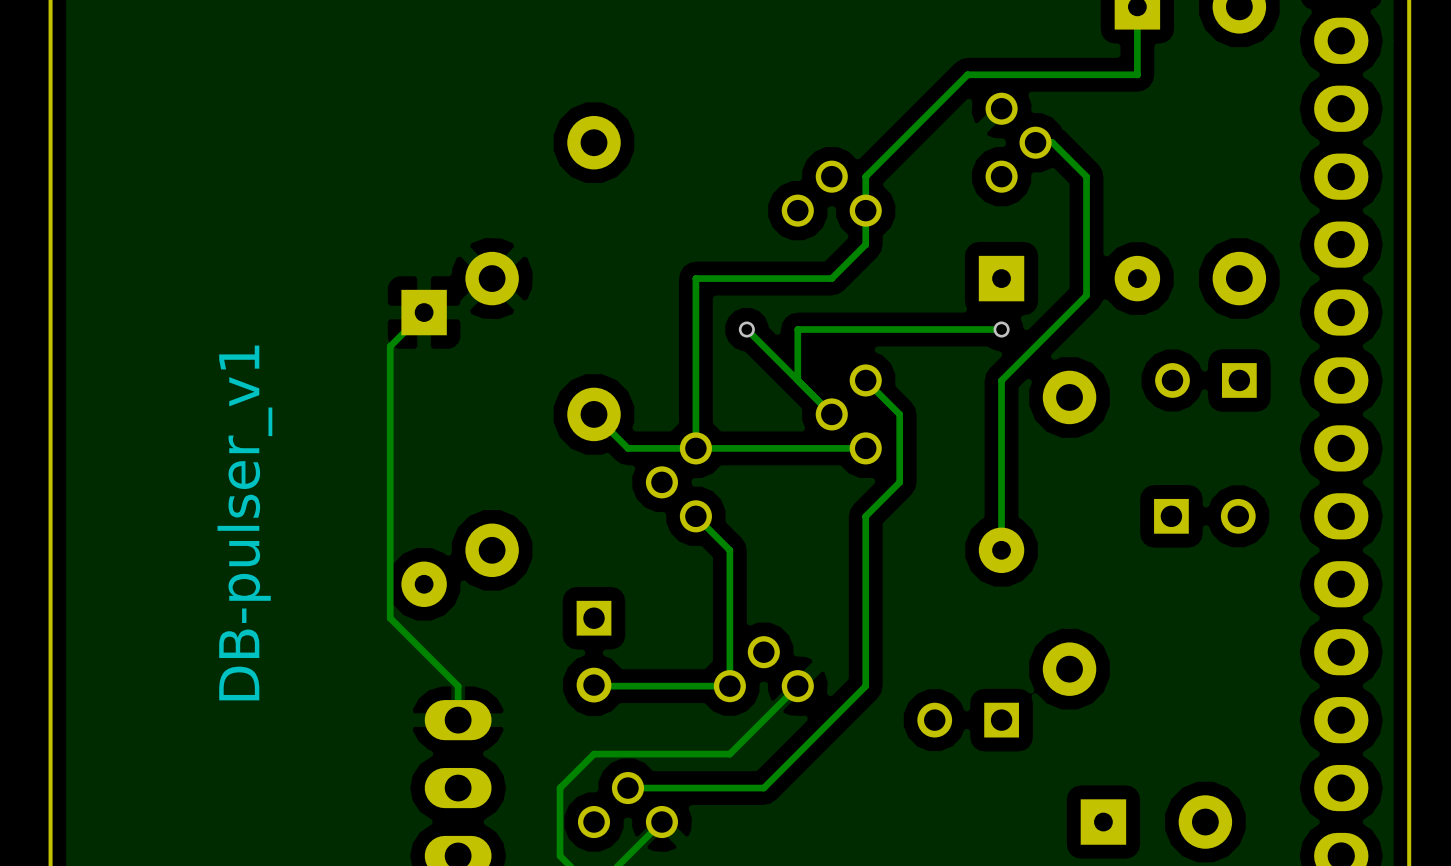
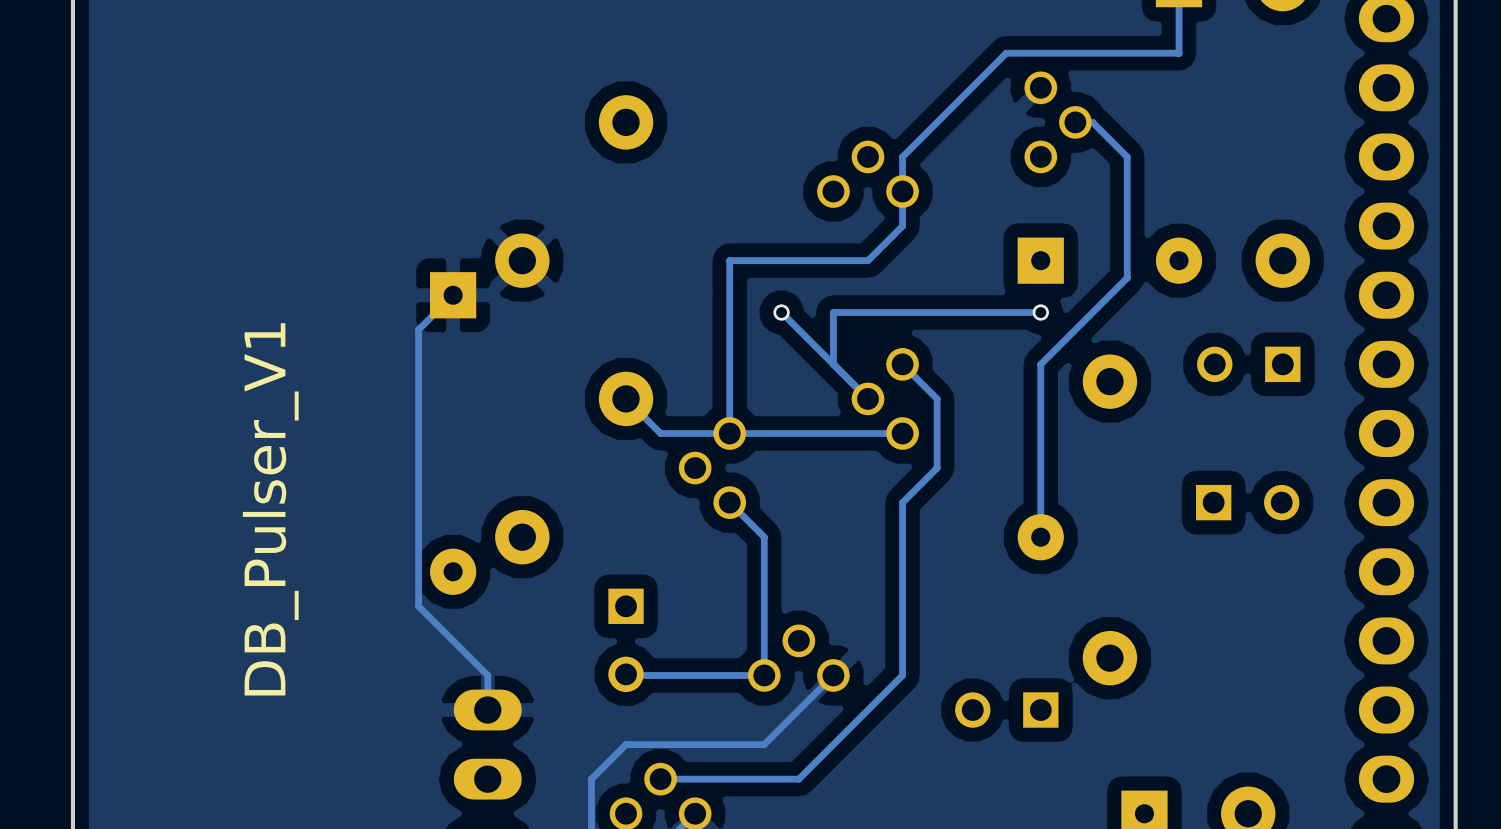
text: DB-pulser_v1 (244, 522) -> DB_Pulser_V1 (270, 509)

